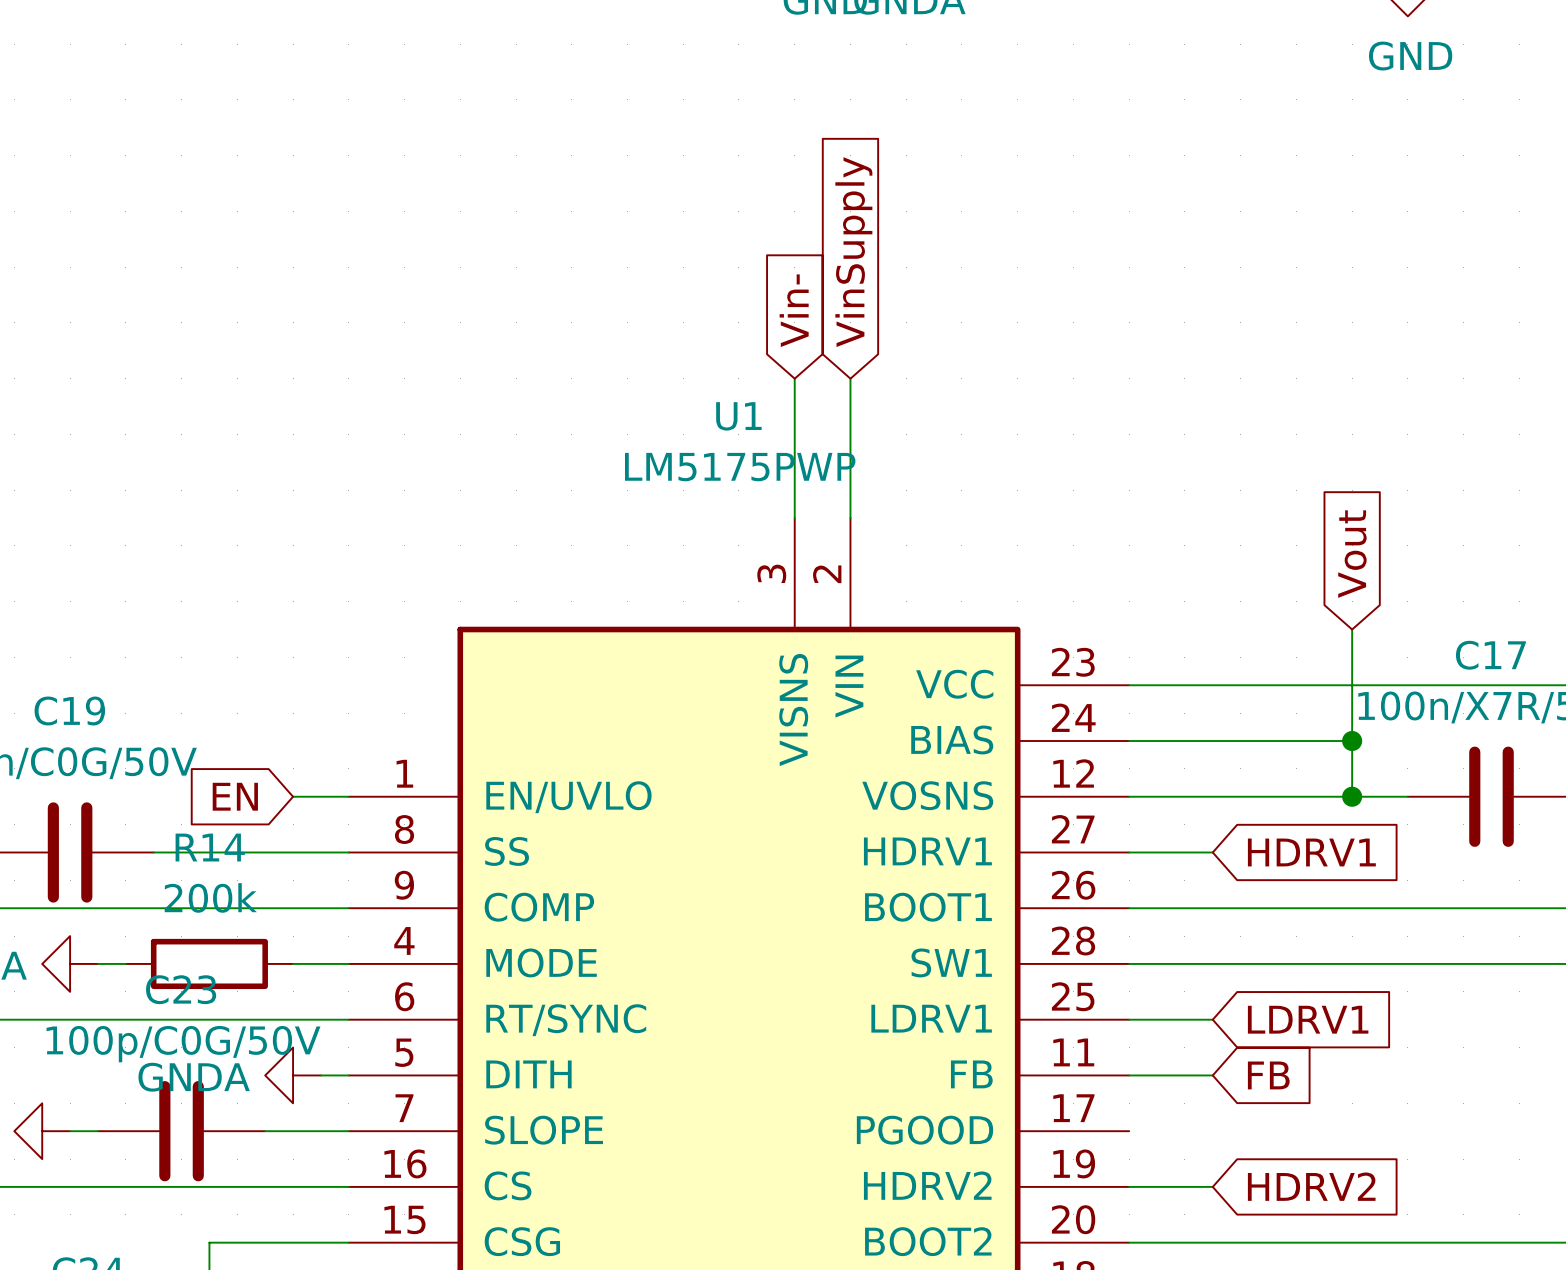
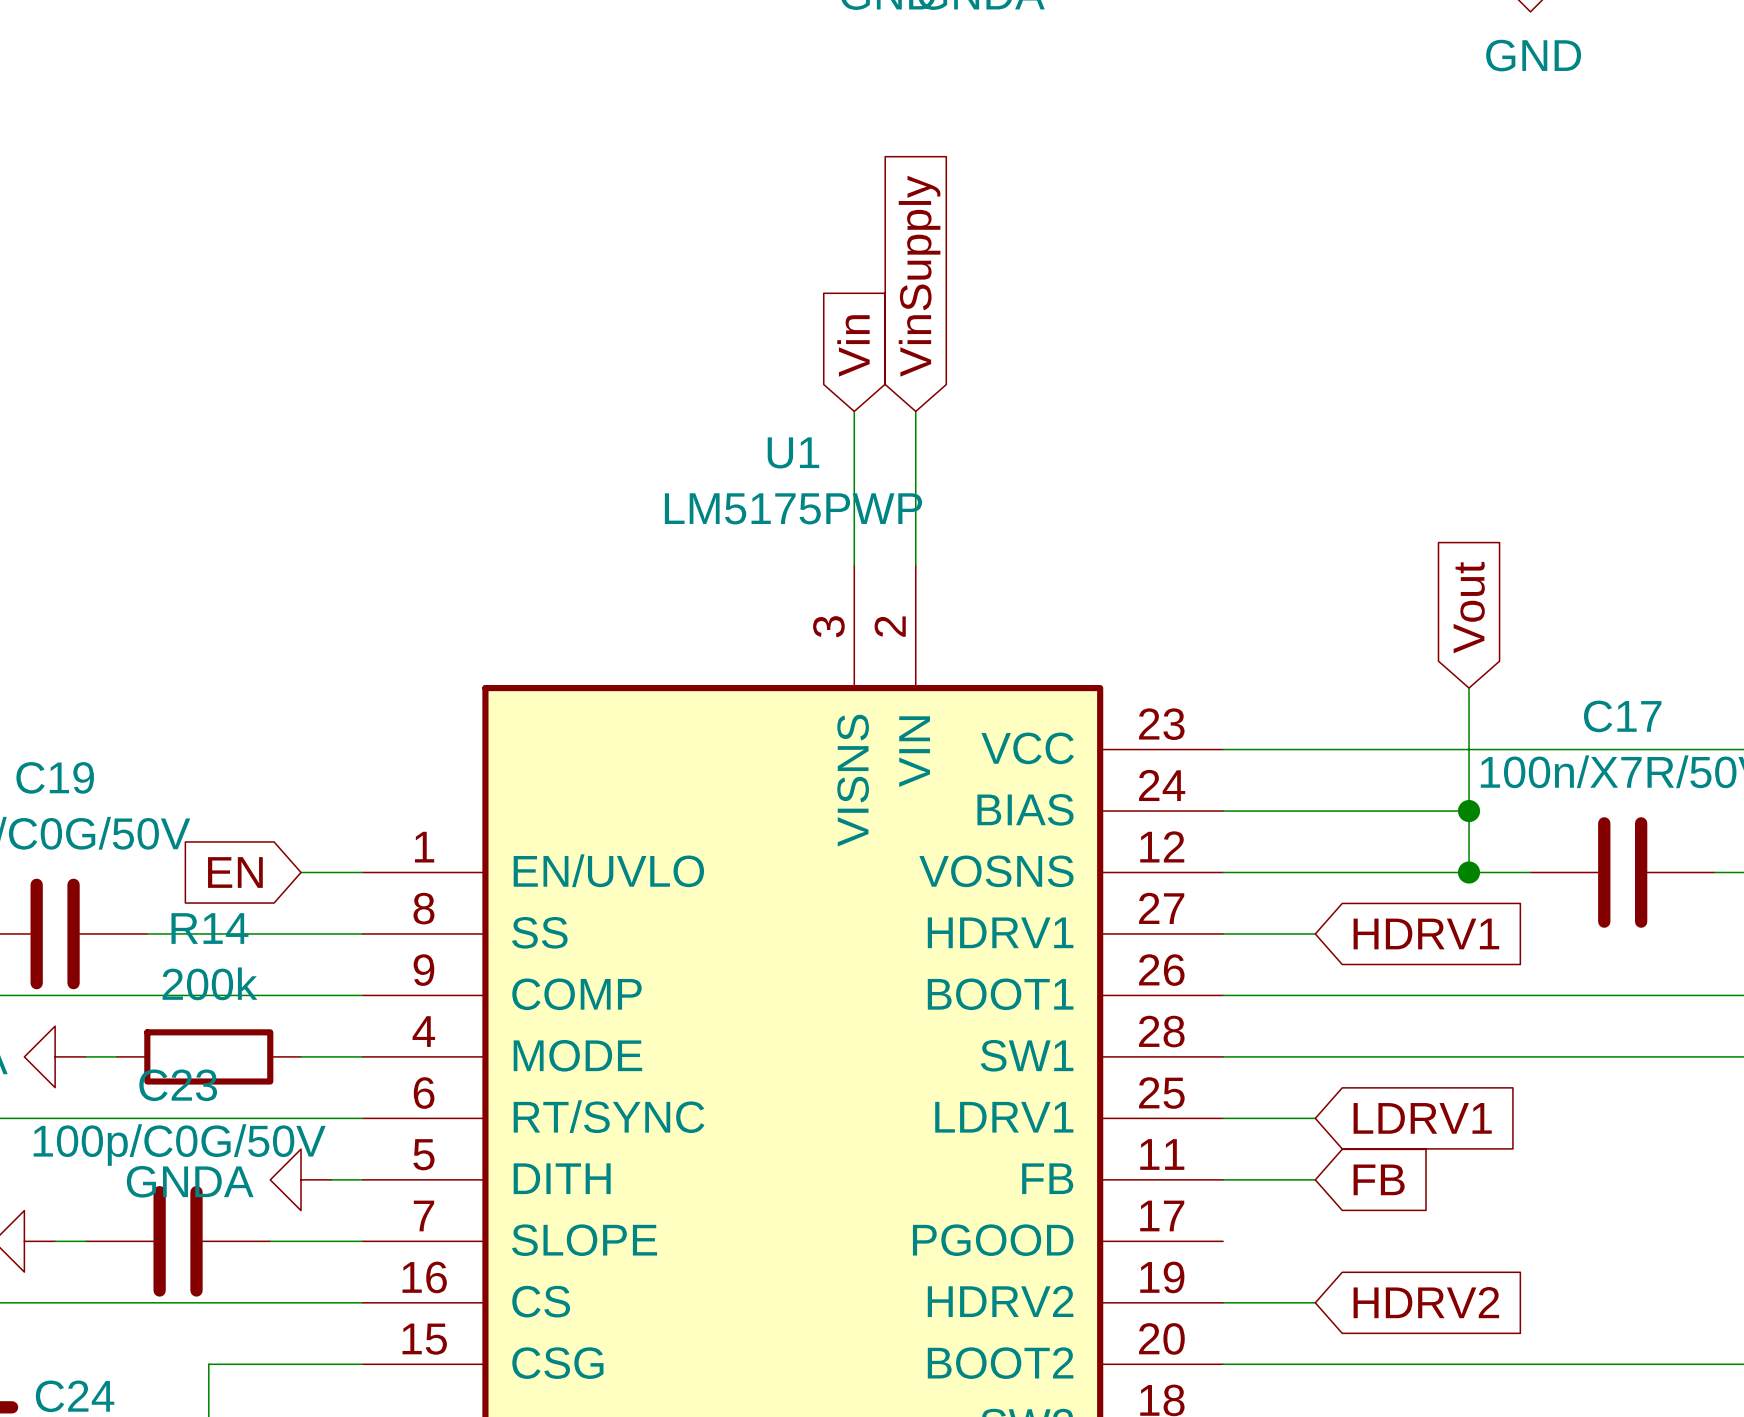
global label: Vin- (794, 310) -> Vin (853, 345)

